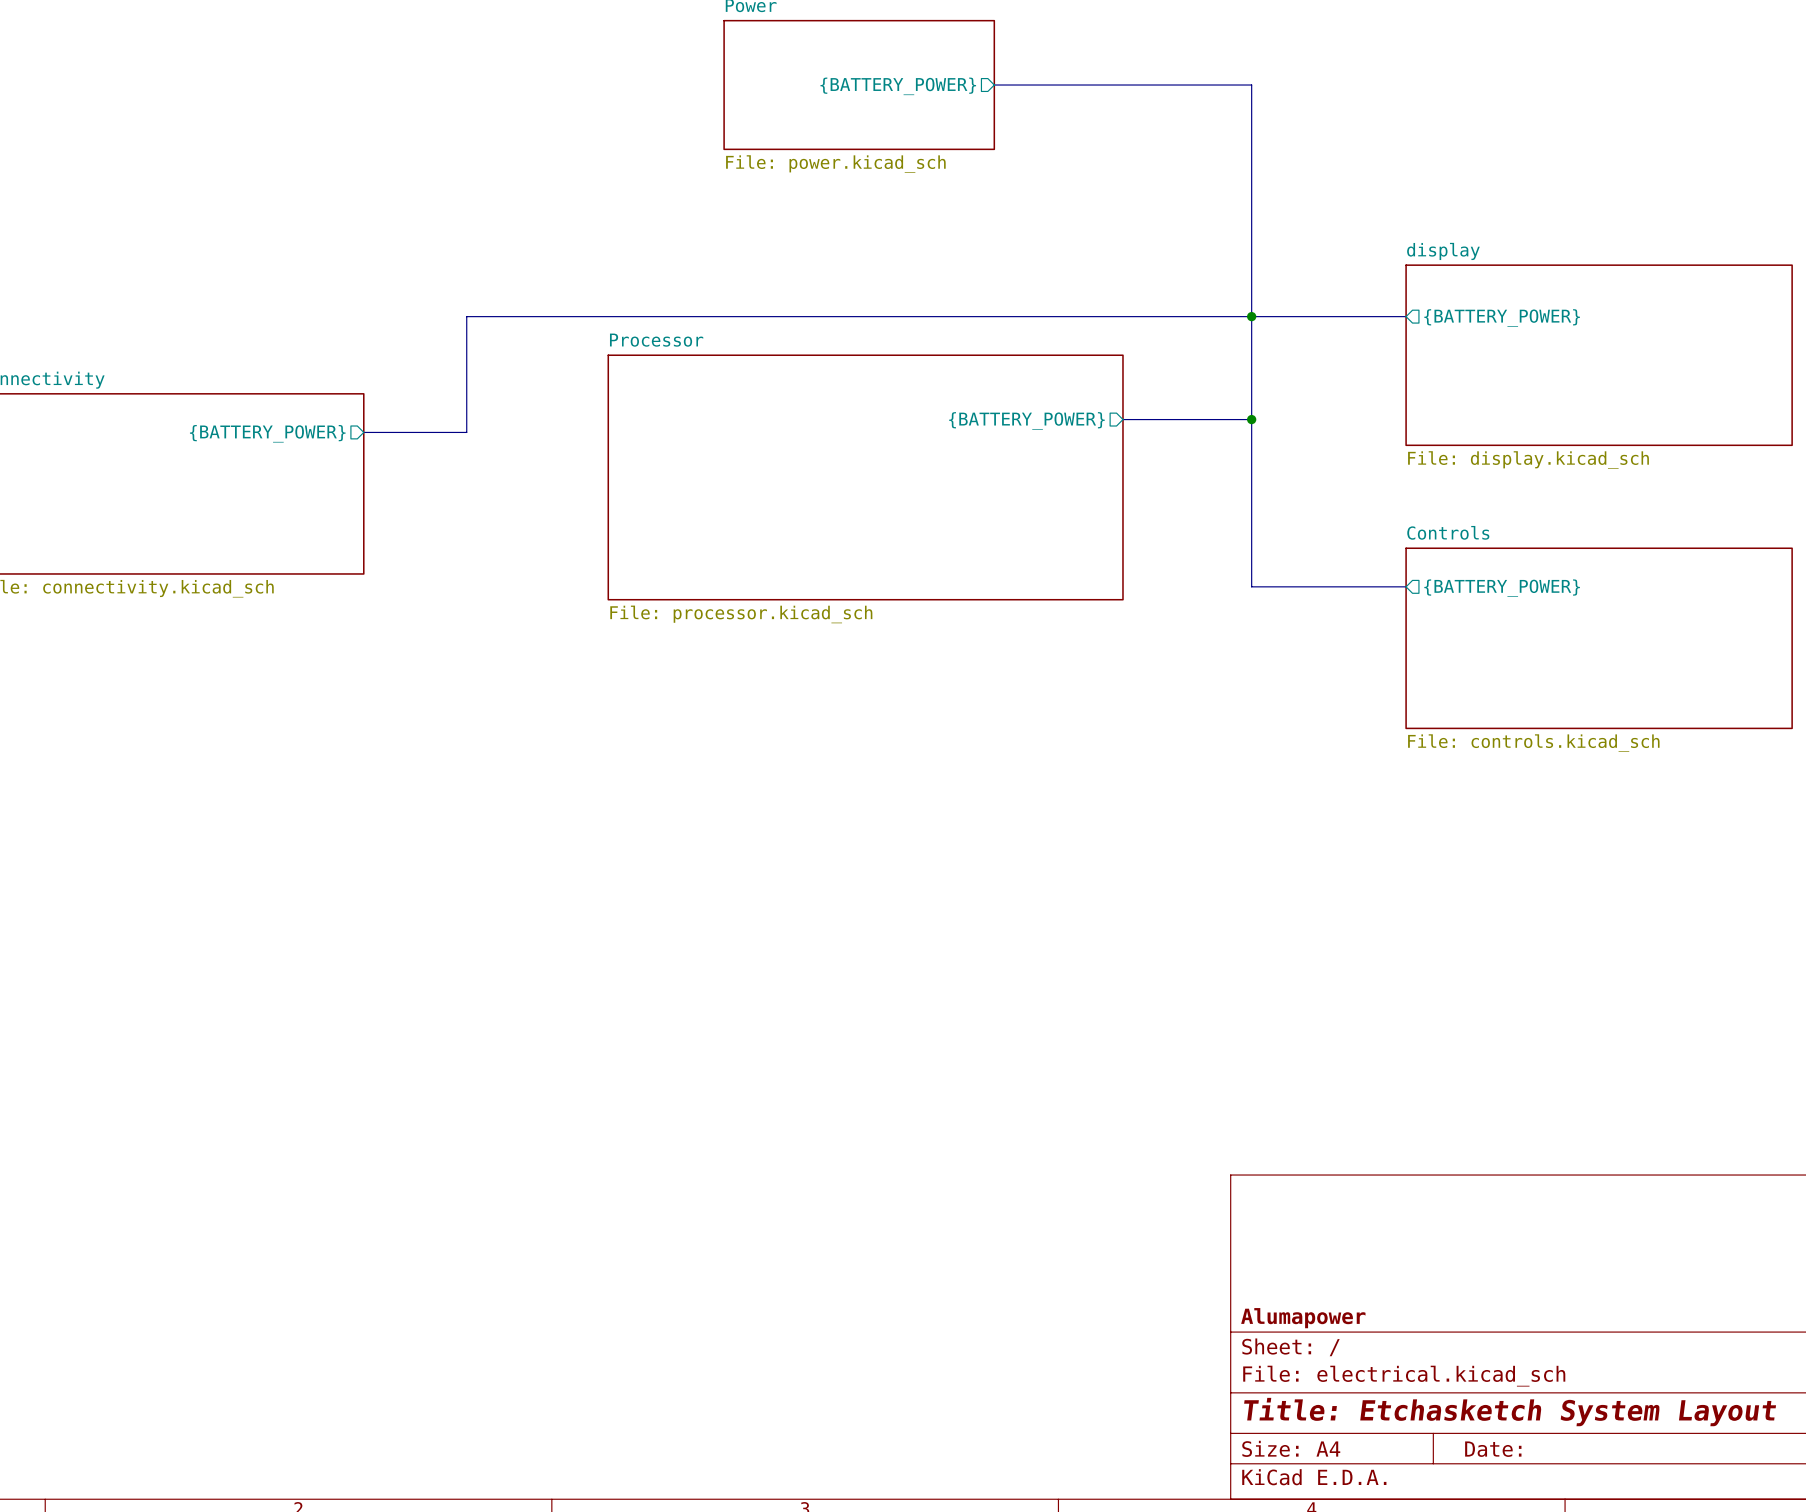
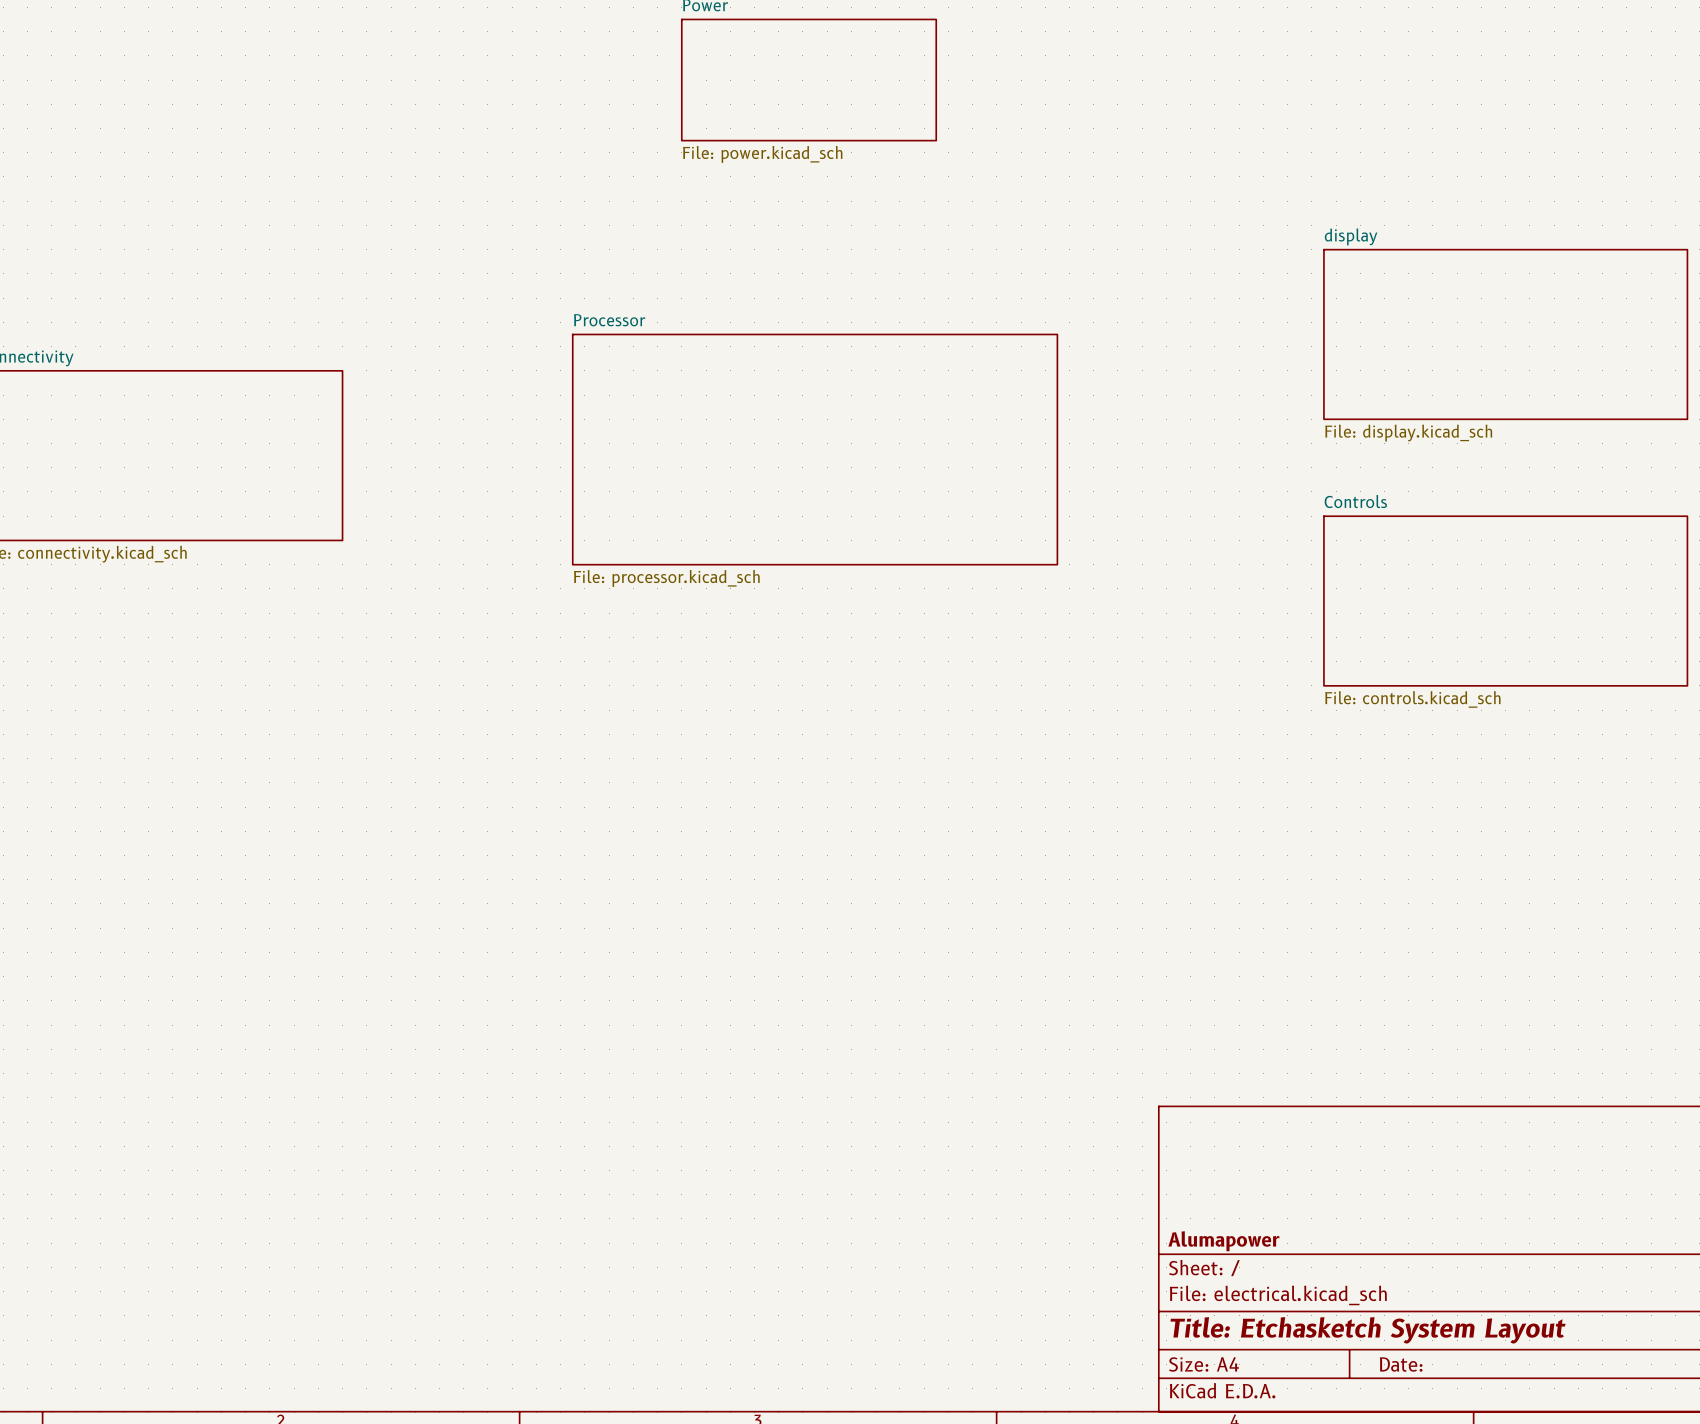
bus: (994, 85) (1251, 85) (1251, 586) (1406, 586) -> none
sheet pin: {BATTERY_POWER} (898, 86) -> none
junction: (1251, 316) -> none
bus: (1406, 316) (466, 316) (466, 432) (363, 432) -> none
sheet pin: {BATTERY_POWER} (1502, 317) -> none
bus: (1122, 419) (1251, 419) -> none
junction: (1251, 419) -> none
sheet pin: {BATTERY_POWER} (1026, 420) -> none
sheet pin: {BATTERY_POWER} (267, 433) -> none
sheet pin: {BATTERY_POWER} (1502, 588) -> none

